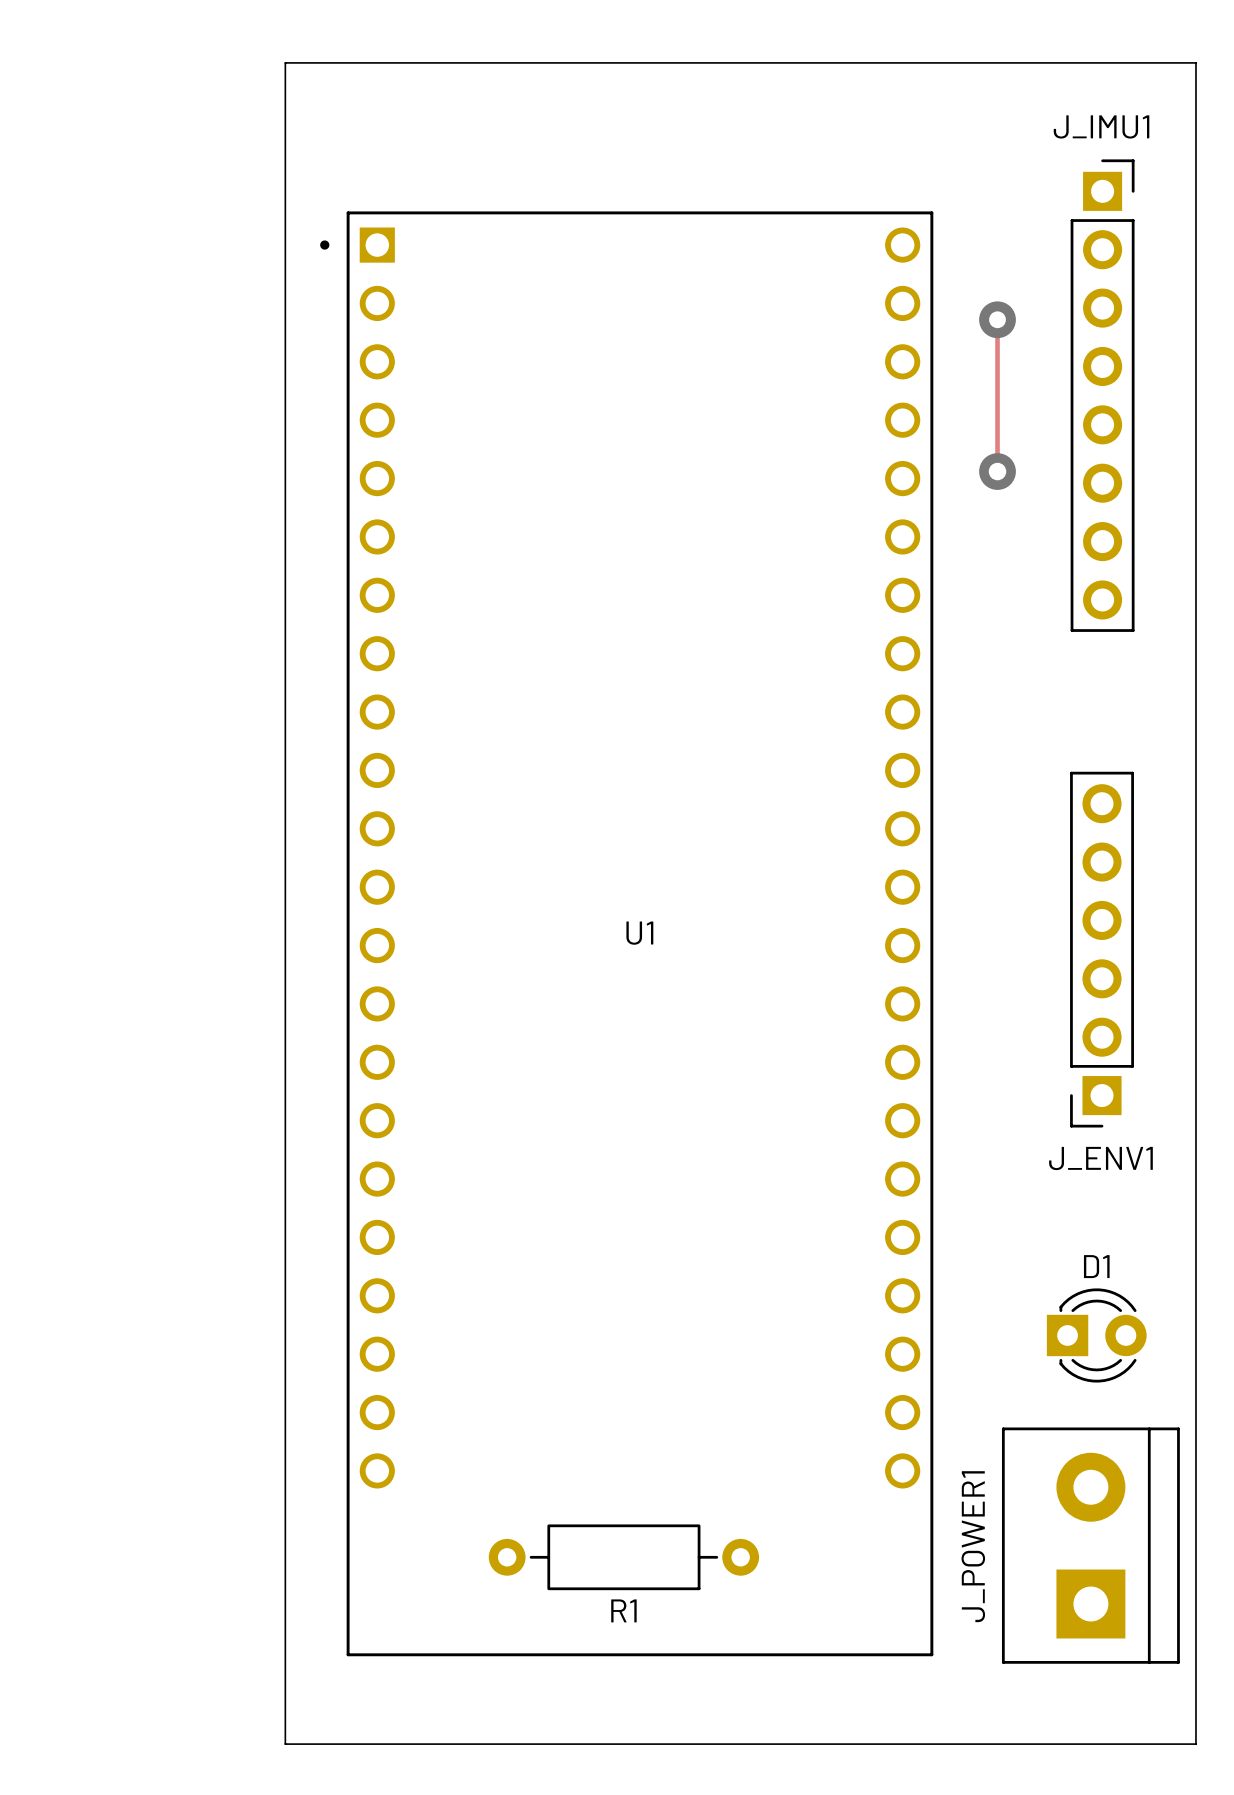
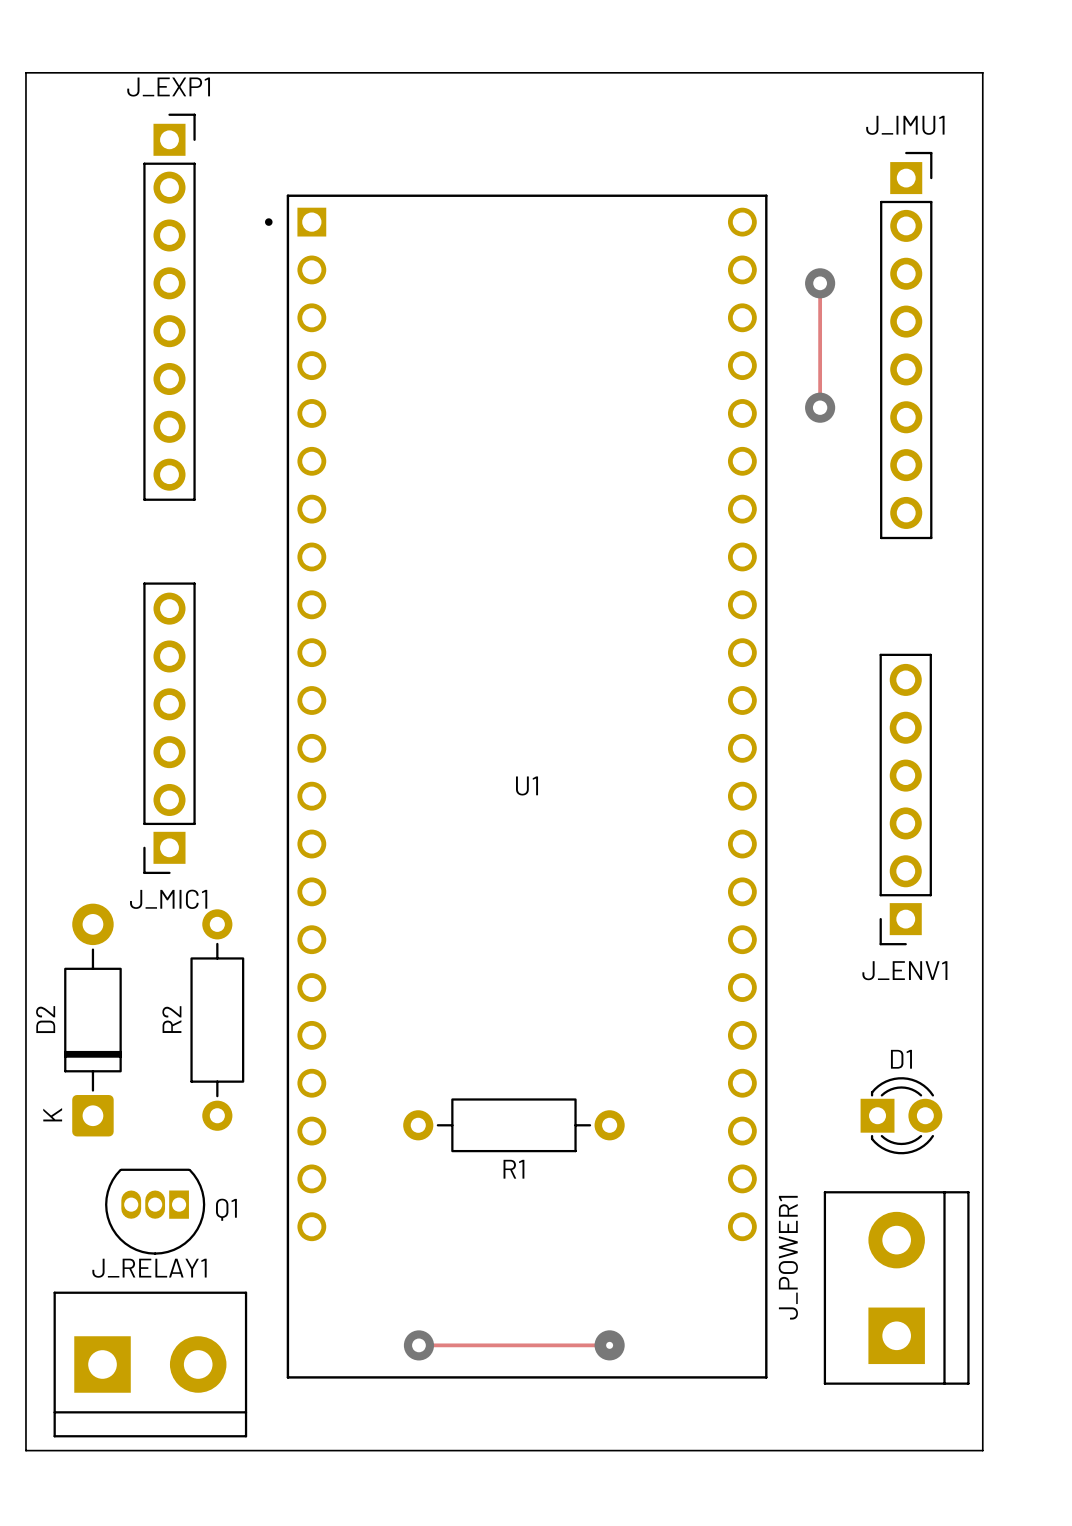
board edge: (285, 62) (285, 1744) -> (236, 72) (25, 72) (25, 1450) (236, 1450)
J_EXP1: none -> (169, 307)
J_MIC1: none -> (169, 728)
D2: none -> (92, 1020)
R2: none -> (217, 1020)
Q1: none -> (155, 1211)
J_POWER1 name position: J_POWER1 (973, 1546) -> J_POWER1 (788, 1257)
R1 position: (623, 1557) -> (513, 1125)
via: none -> (418, 1345)
track: none -> (609, 1345) (427, 1345) (418, 1354)
via: none -> (609, 1345)
J_RELAY1: none -> (150, 1364)

